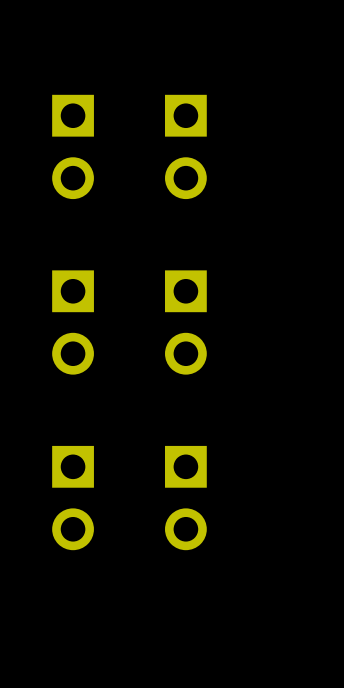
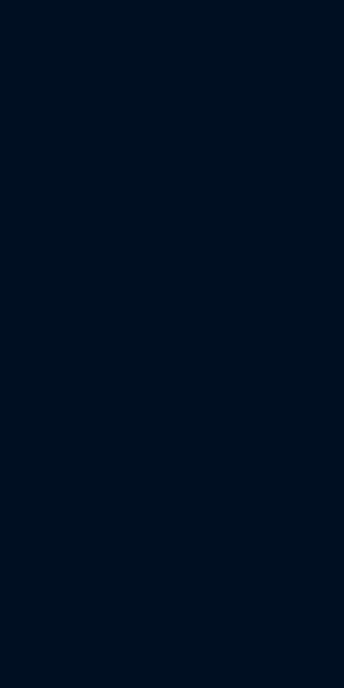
part: (73, 146) -> none
part: (185, 146) -> none
part: (73, 322) -> none
part: (185, 322) -> none
part: (73, 498) -> none
part: (185, 498) -> none

